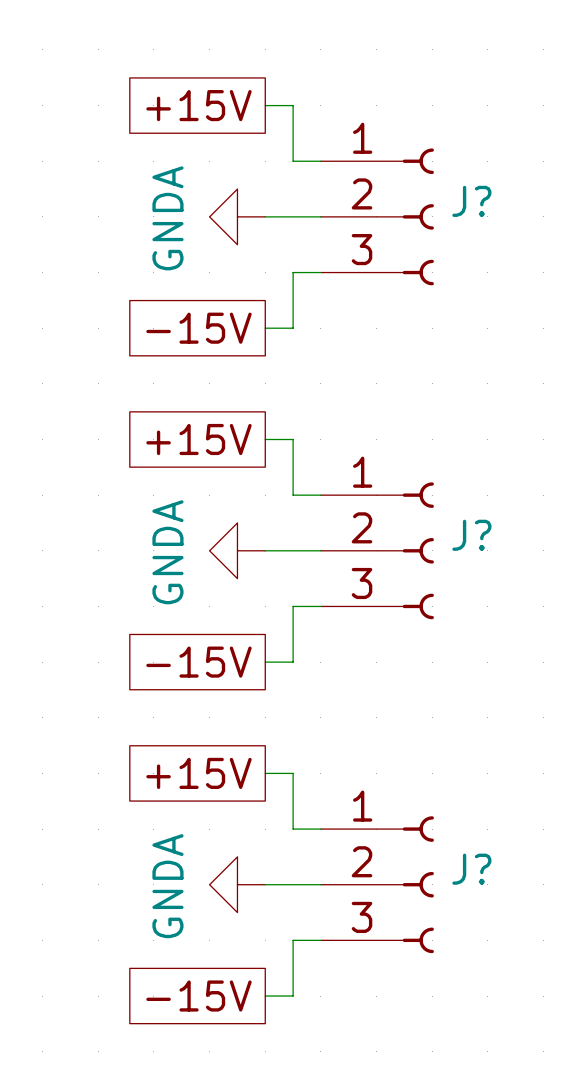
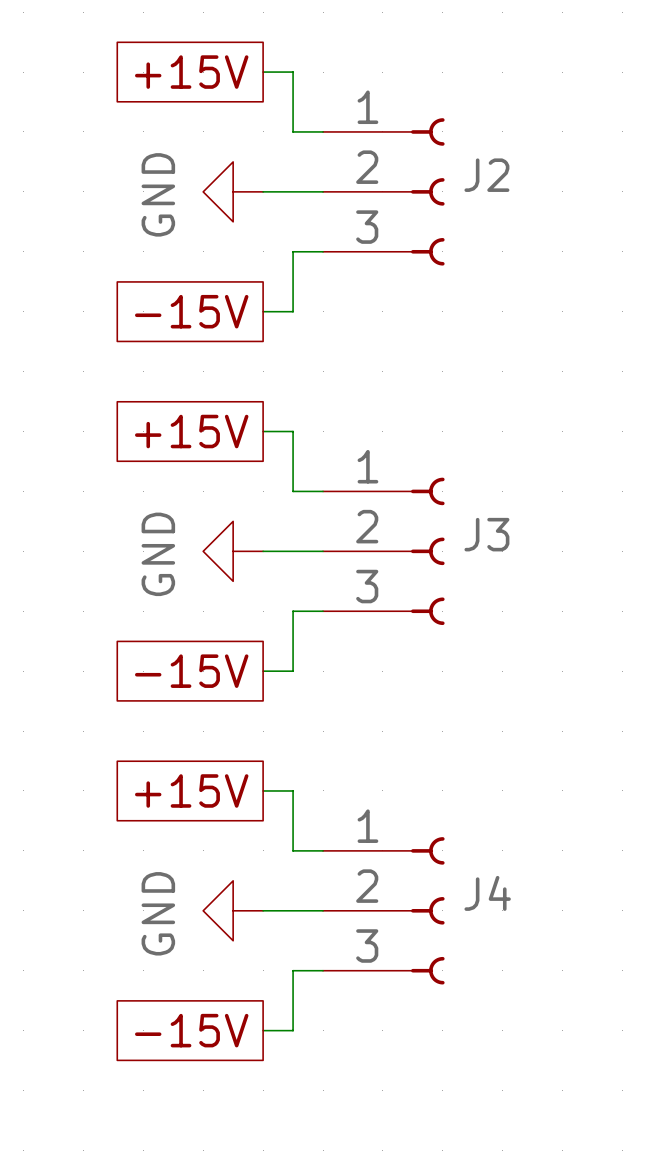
J? name: J? (471, 201) -> J2 (486, 175)
power symbol: GNDA (237, 216) -> GND (233, 191)
J? name: J? (471, 535) -> J3 (486, 534)
power symbol: GNDA (237, 550) -> GND (233, 551)
J? name: J? (471, 869) -> J4 (487, 893)
power symbol: GNDA (237, 884) -> GND (233, 910)

